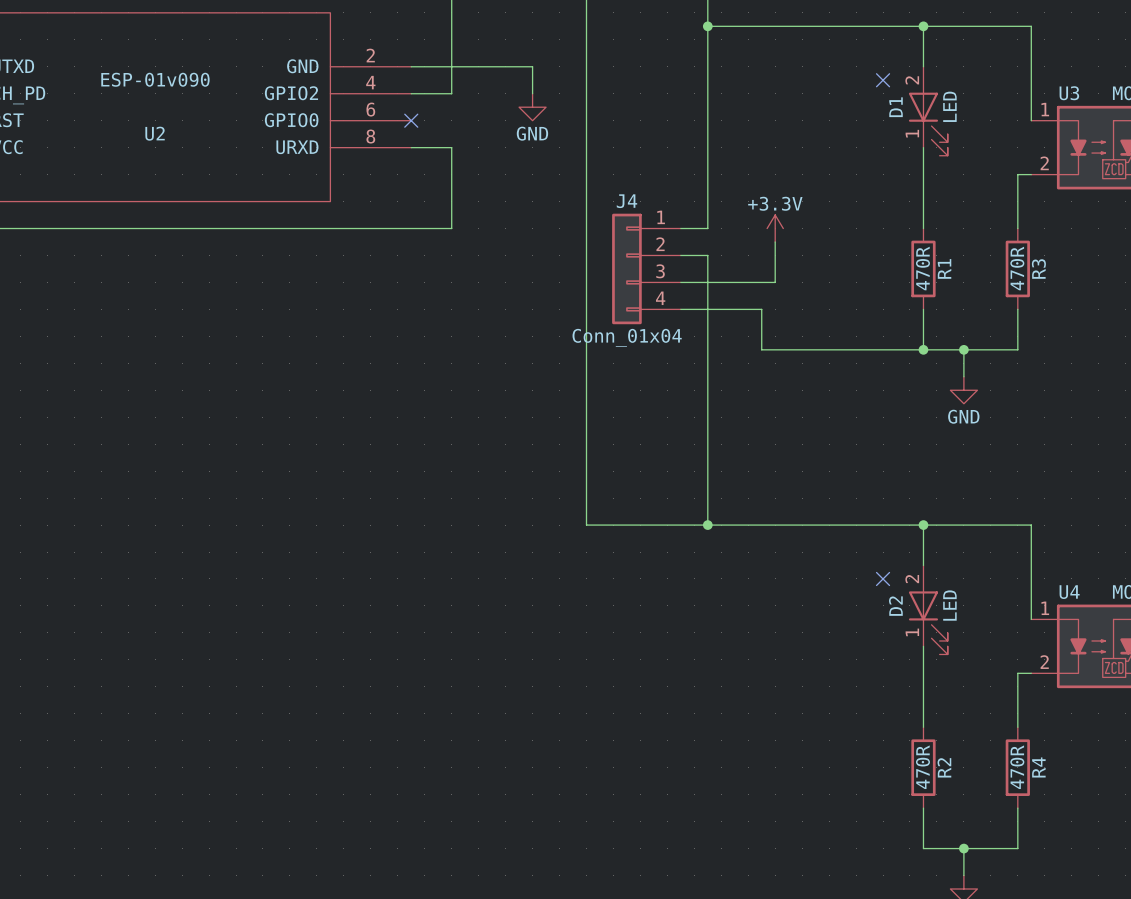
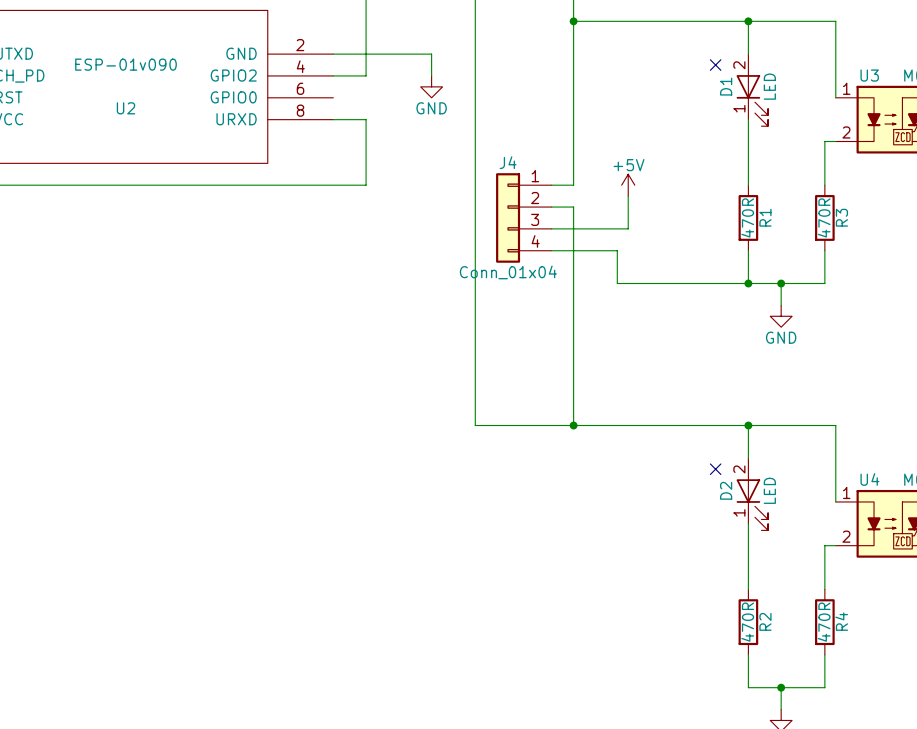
no-connect mark: (411, 120) -> none
power symbol: +3.3V (775, 228) -> +5V (628, 185)

